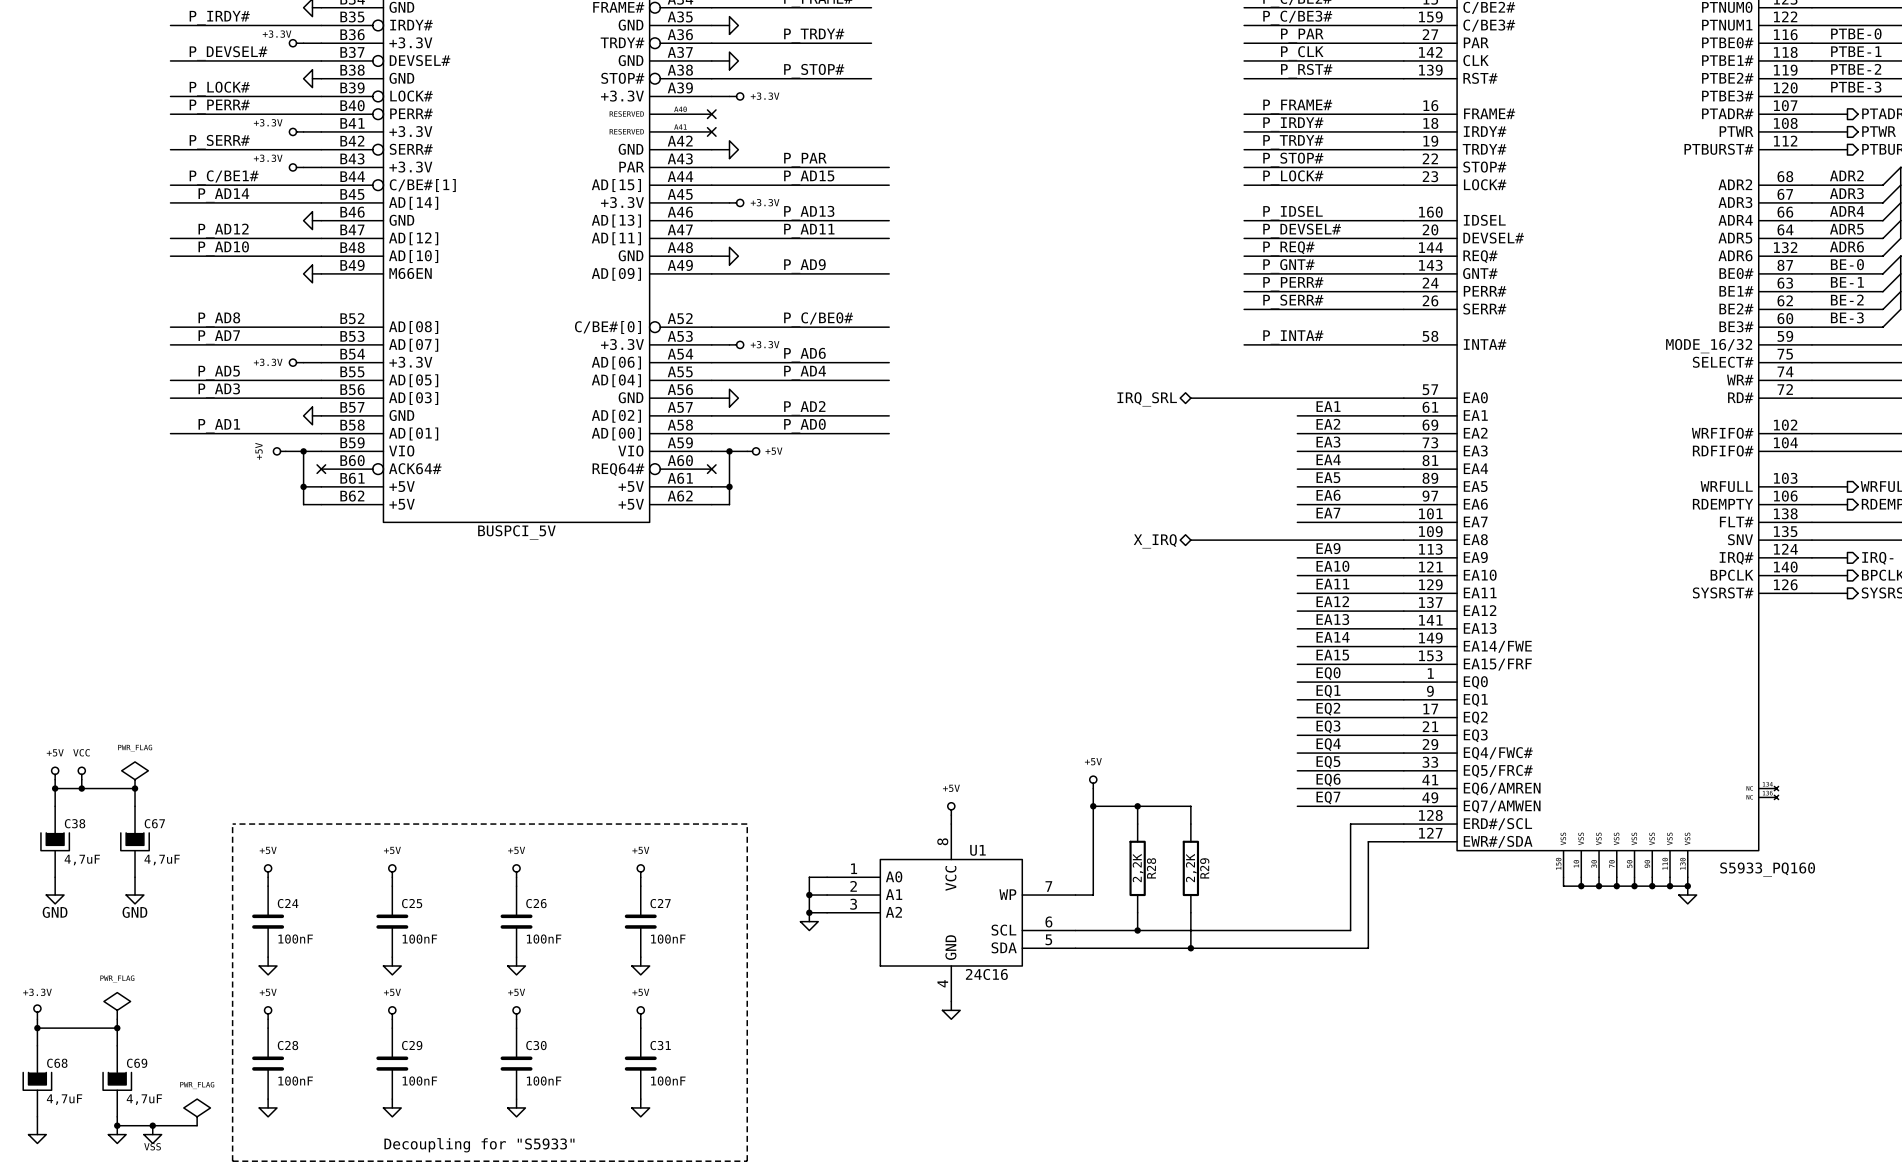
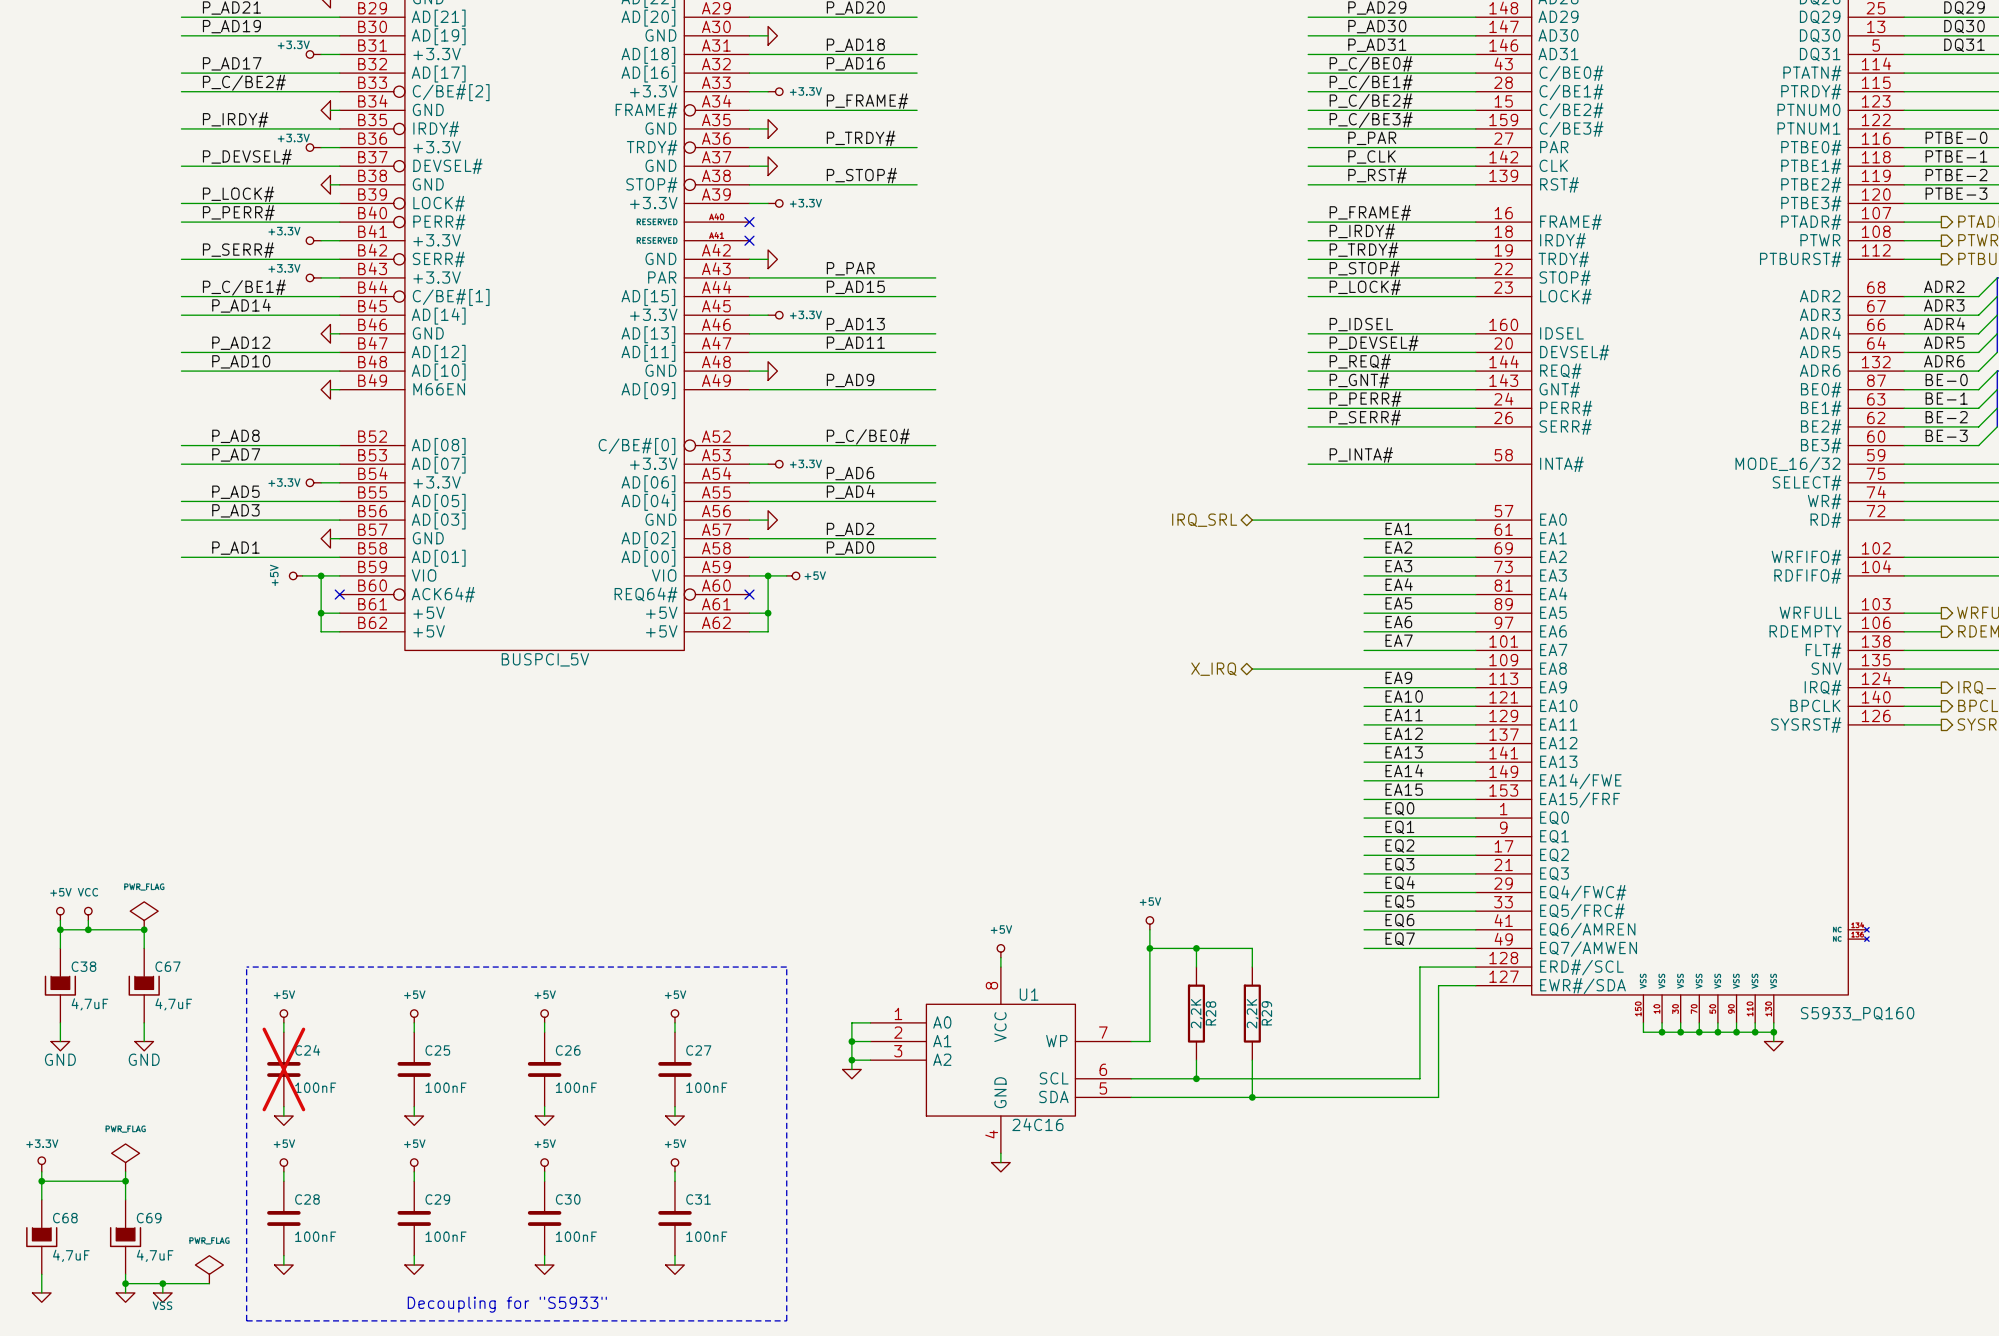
C24 do-not-place cross: none -> (283, 1069)

